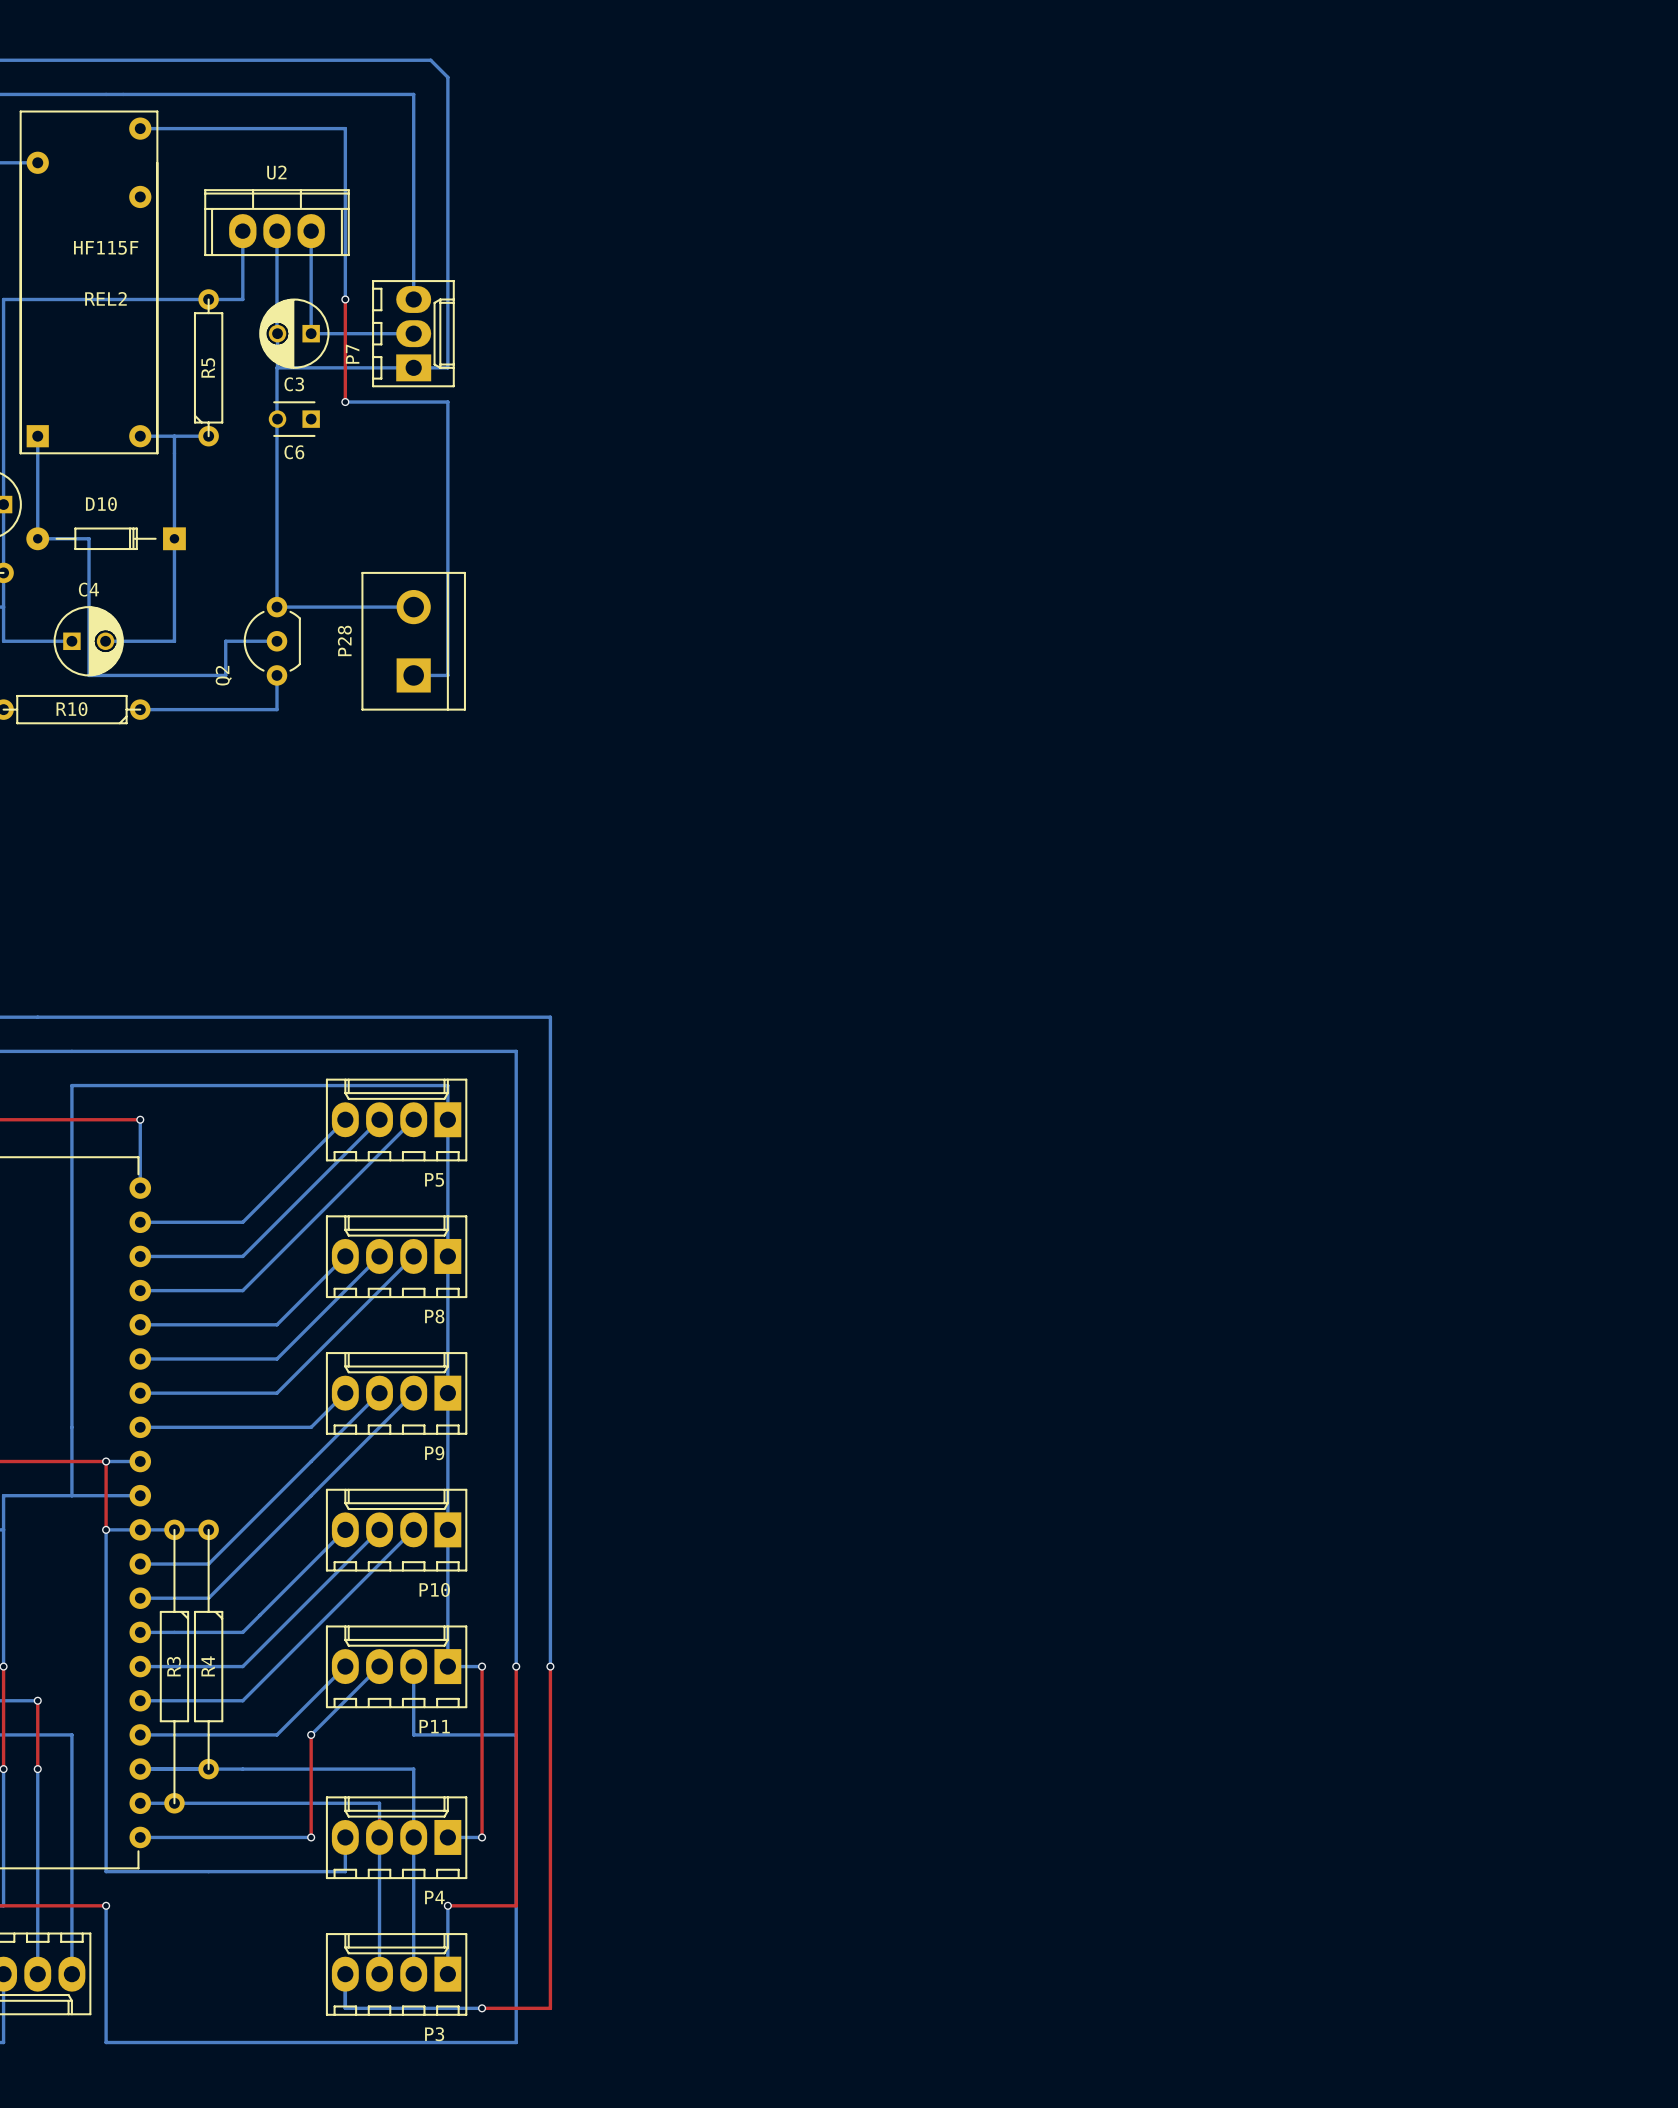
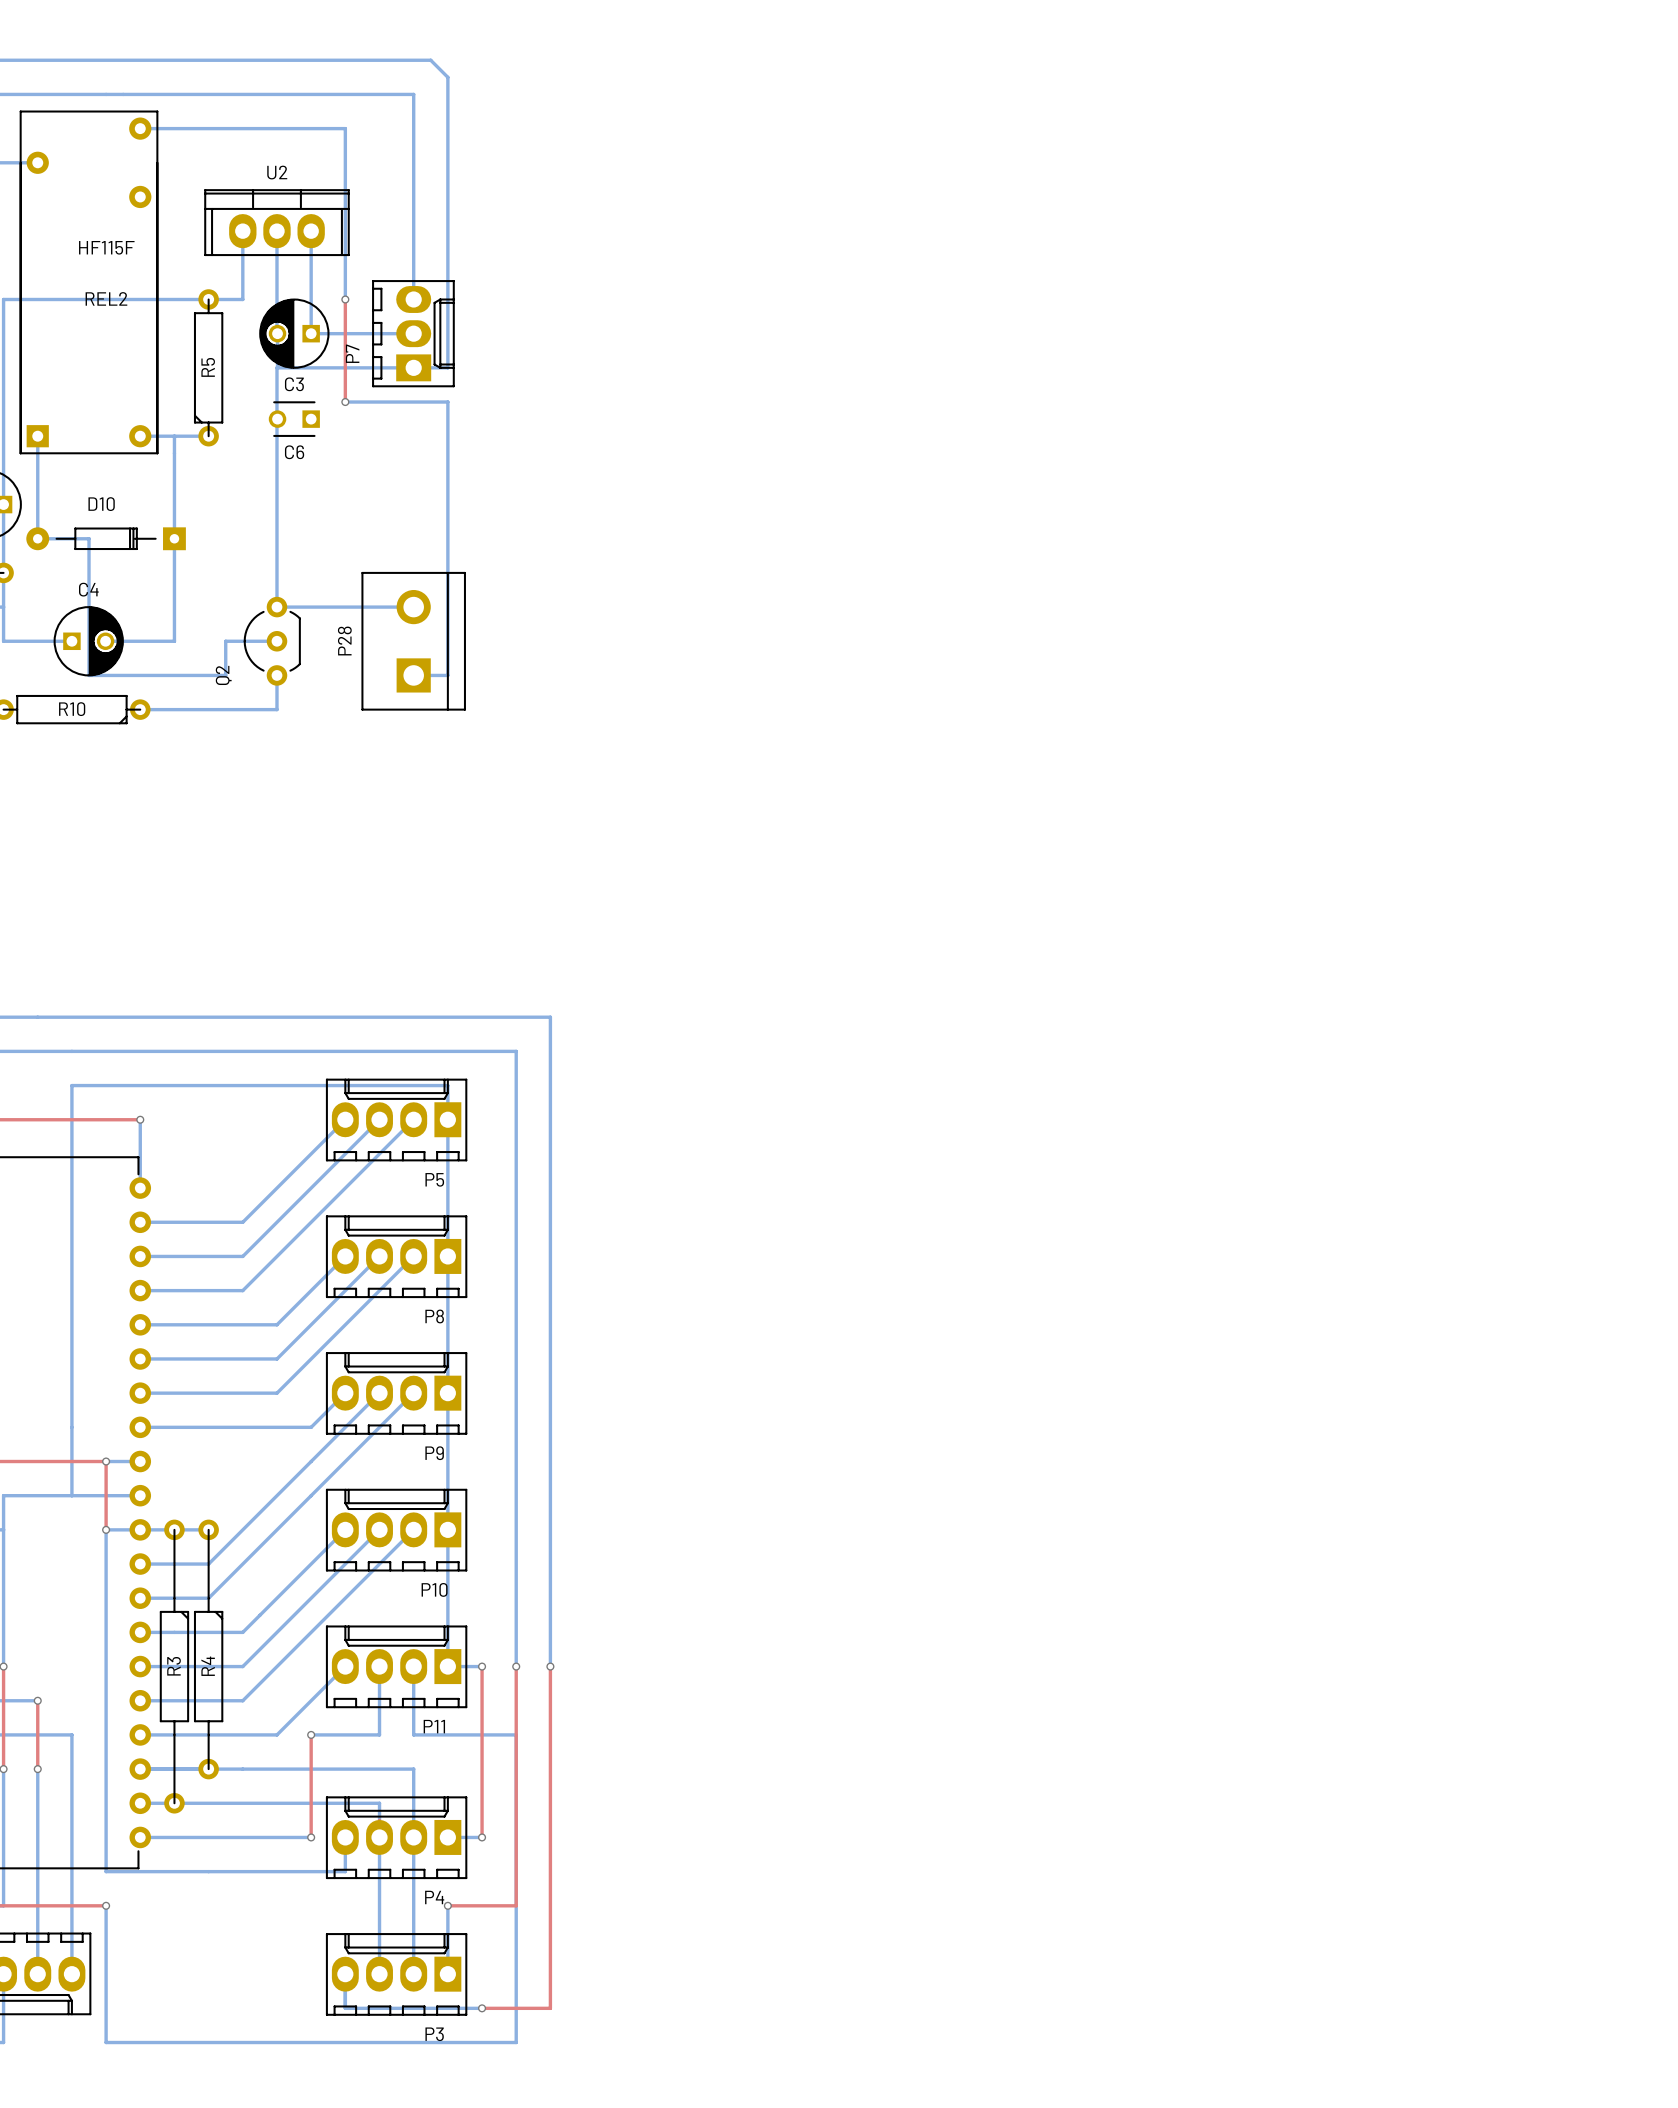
bottom track: (379, 1666) (311, 1734) -> (379, 1666) (379, 1734) (311, 1734)

